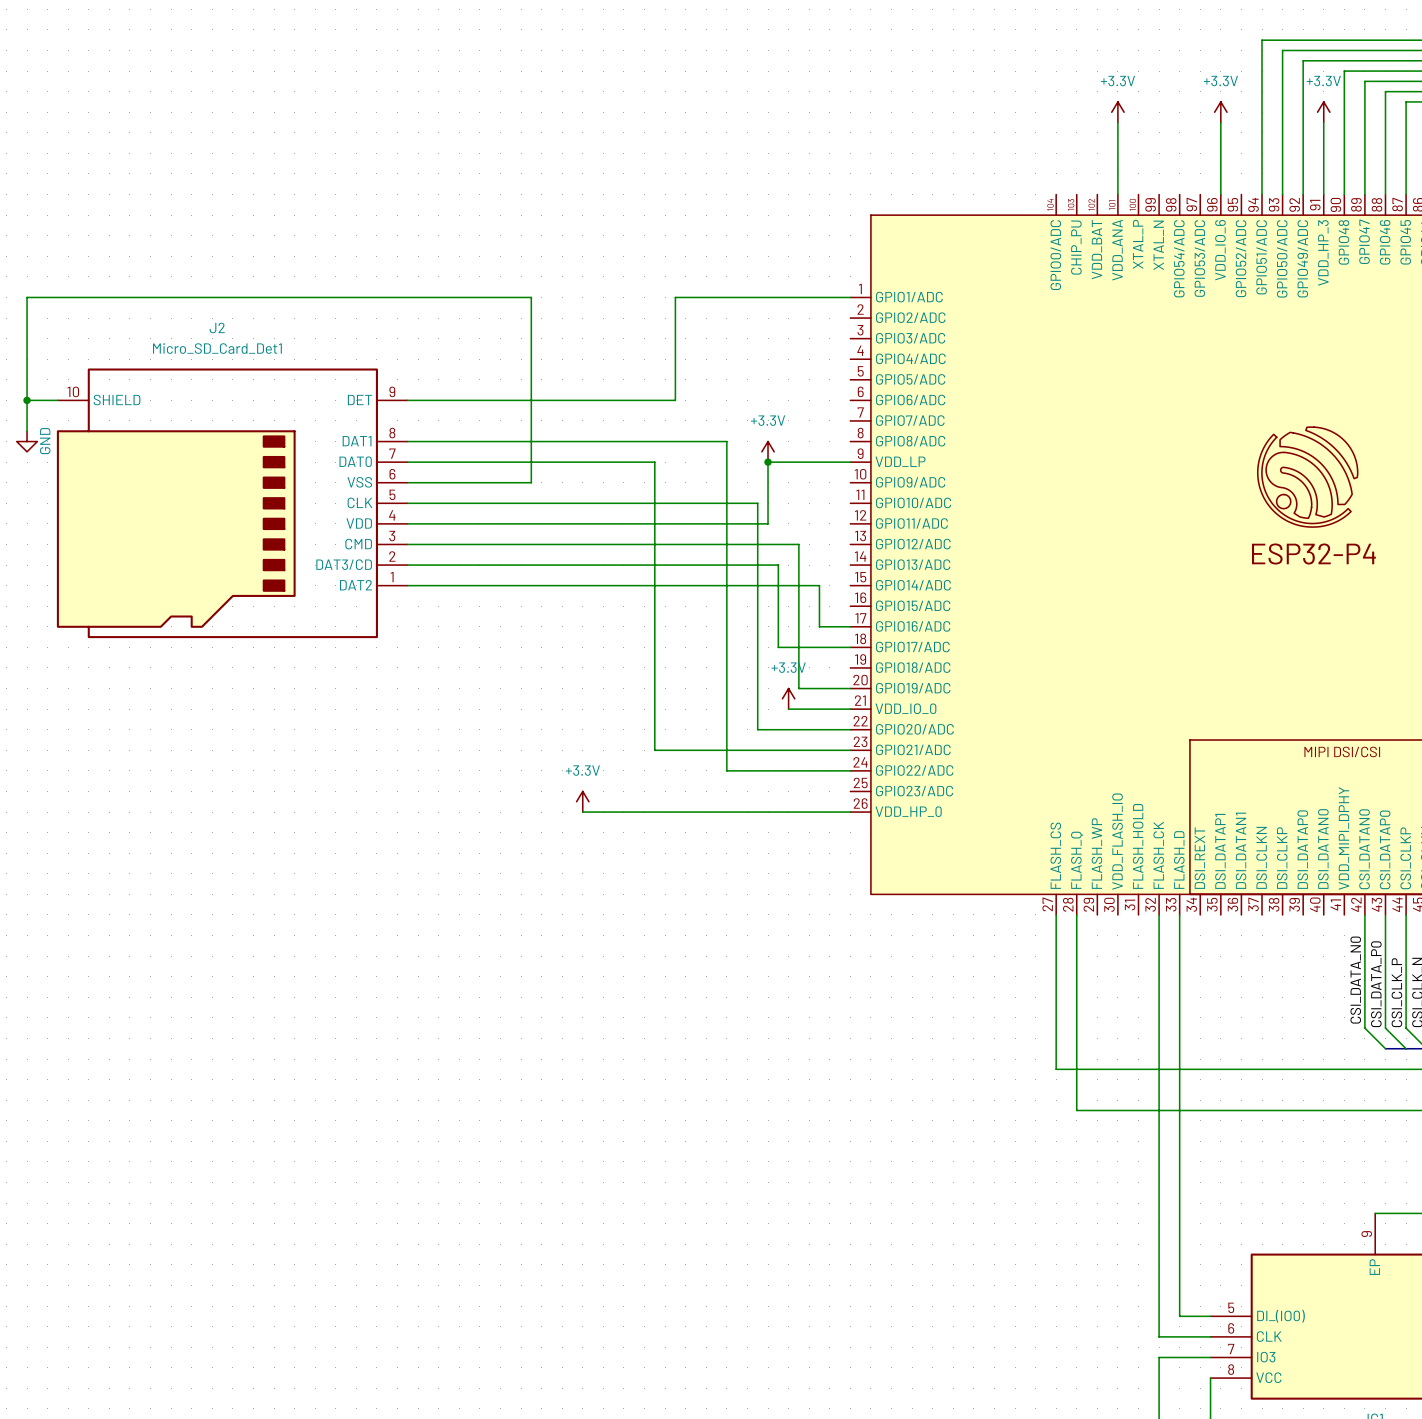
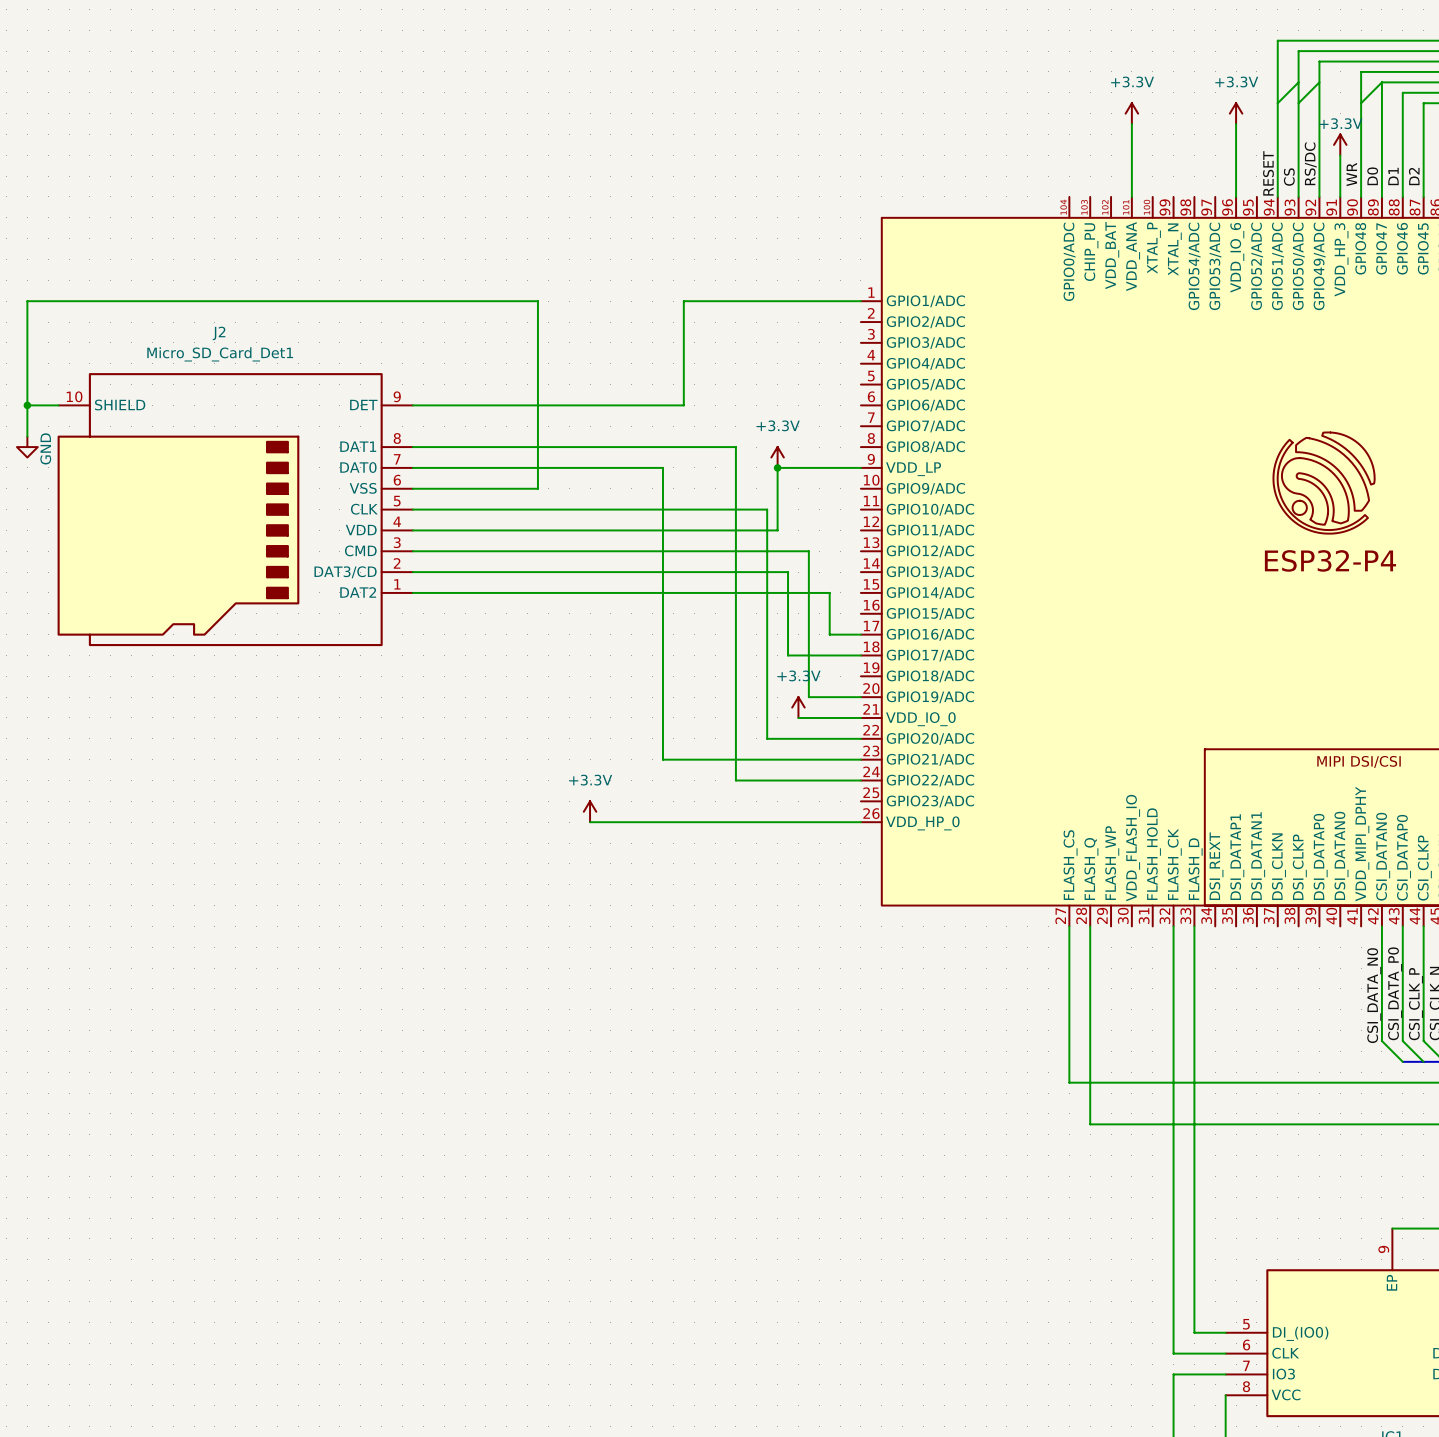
wire: none -> (1298, 82) (1277, 103)
wire: none -> (1319, 82) (1298, 103)
power symbol text position: +3.3V (1323, 81) -> +3.3V (1340, 123)
wire: none -> (1381, 82) (1361, 103)
power symbol position: +3.3V (1323, 112) -> +3.3V (1340, 144)
label: none -> RS/DC (1310, 163)
label: none -> RESET (1268, 173)
label: none -> WR (1351, 174)
label: none -> CS (1289, 177)
label: none -> D0 (1372, 176)
label: none -> D2 (1414, 176)
label: none -> D1 (1393, 176)

